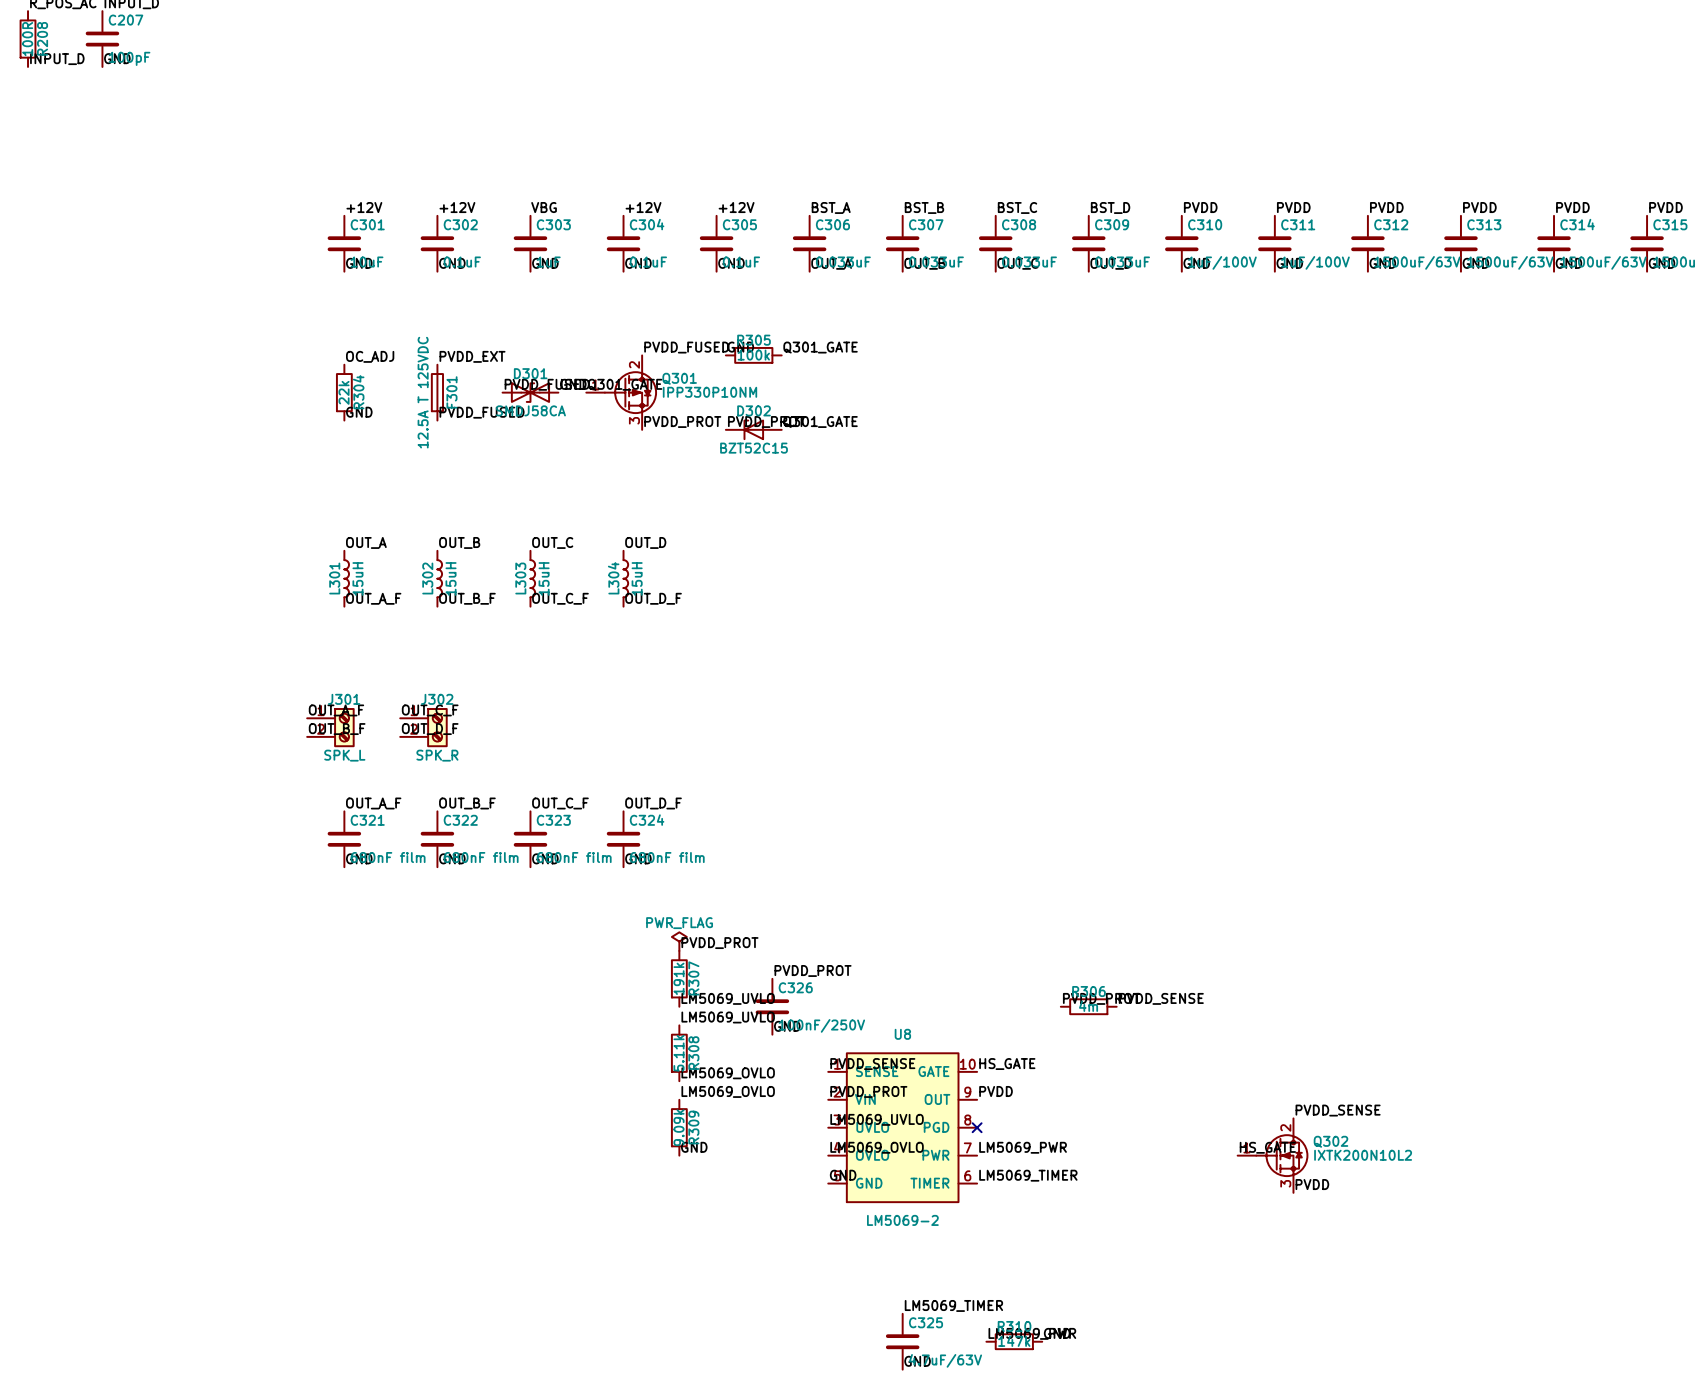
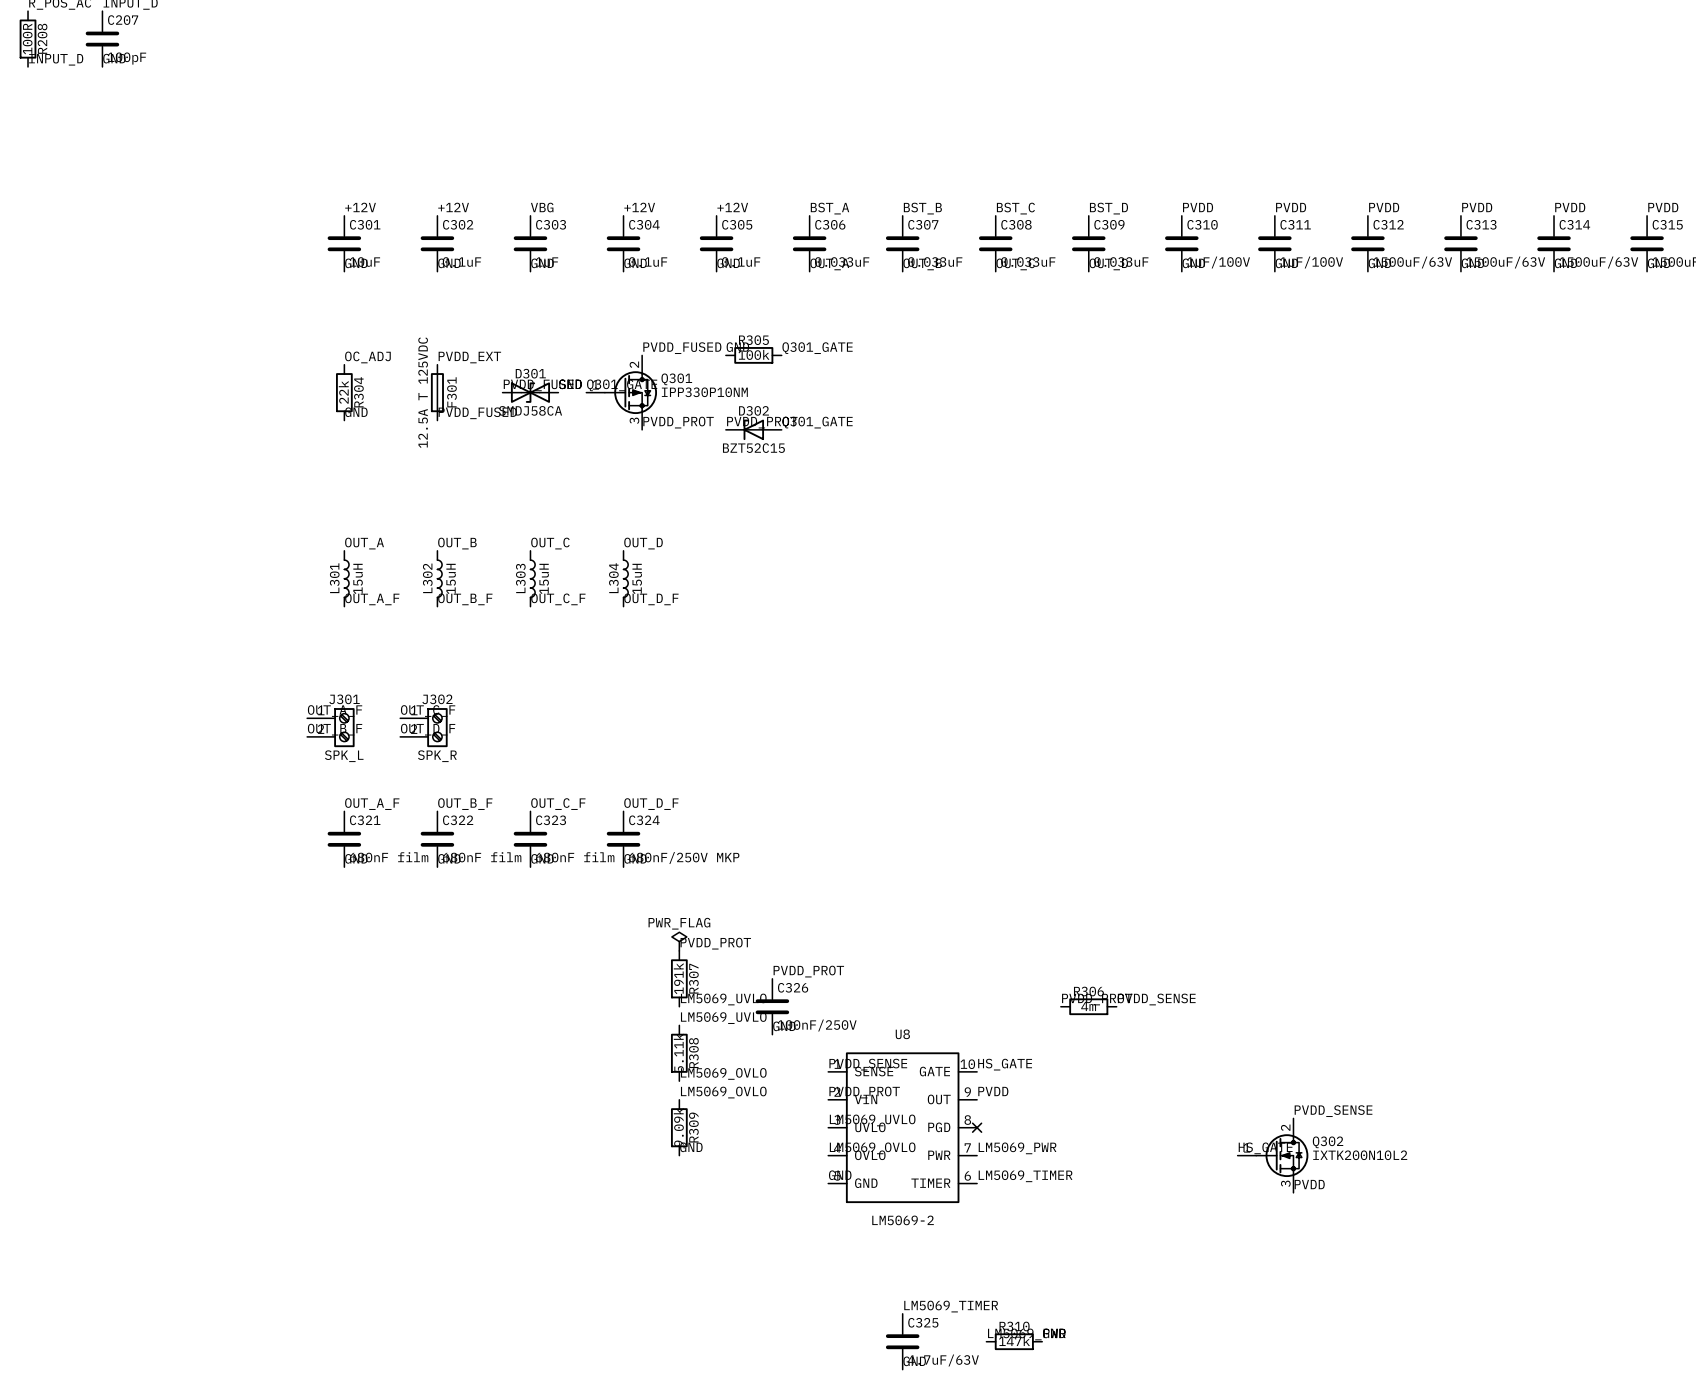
C324 value: 680nF film (667, 857) -> 680nF/250V MKP (684, 858)

